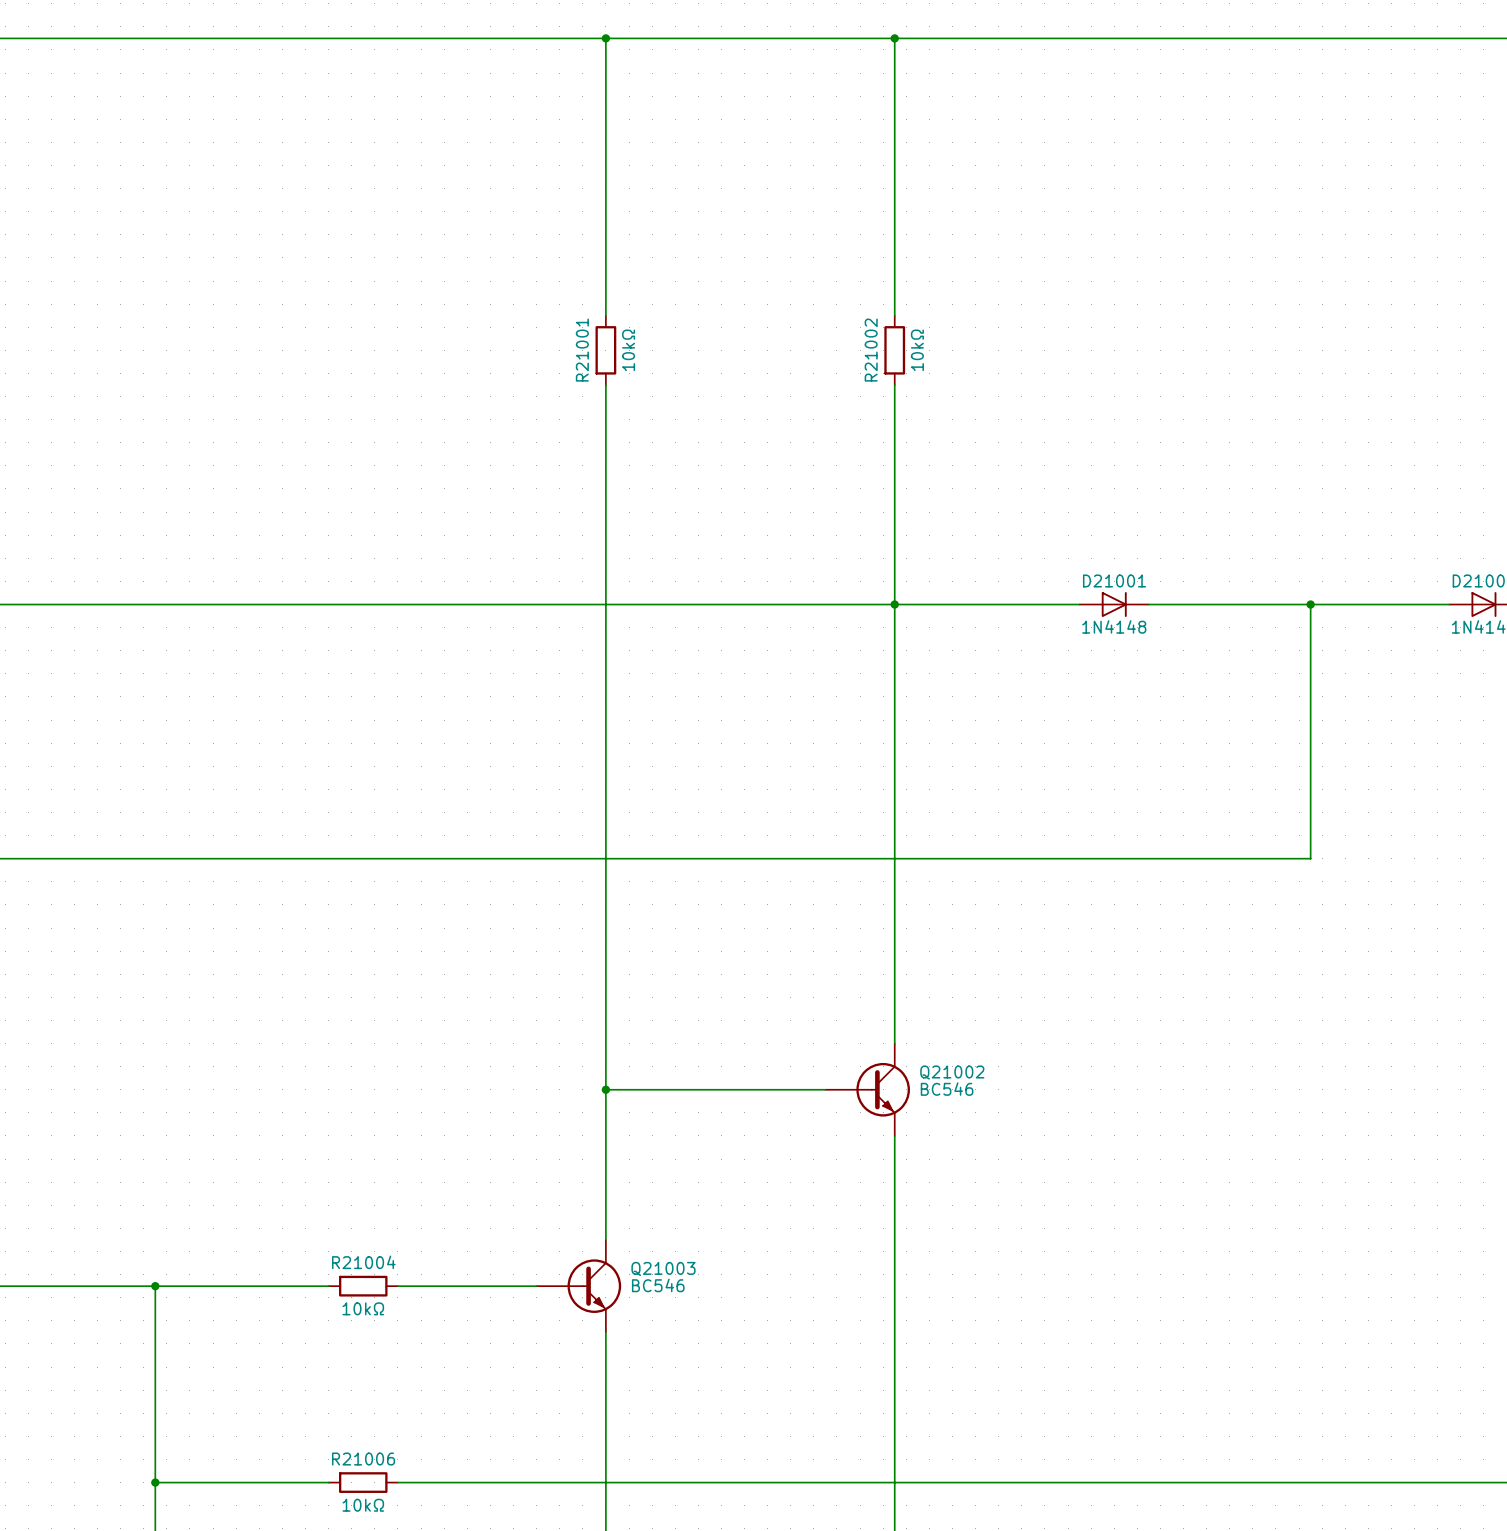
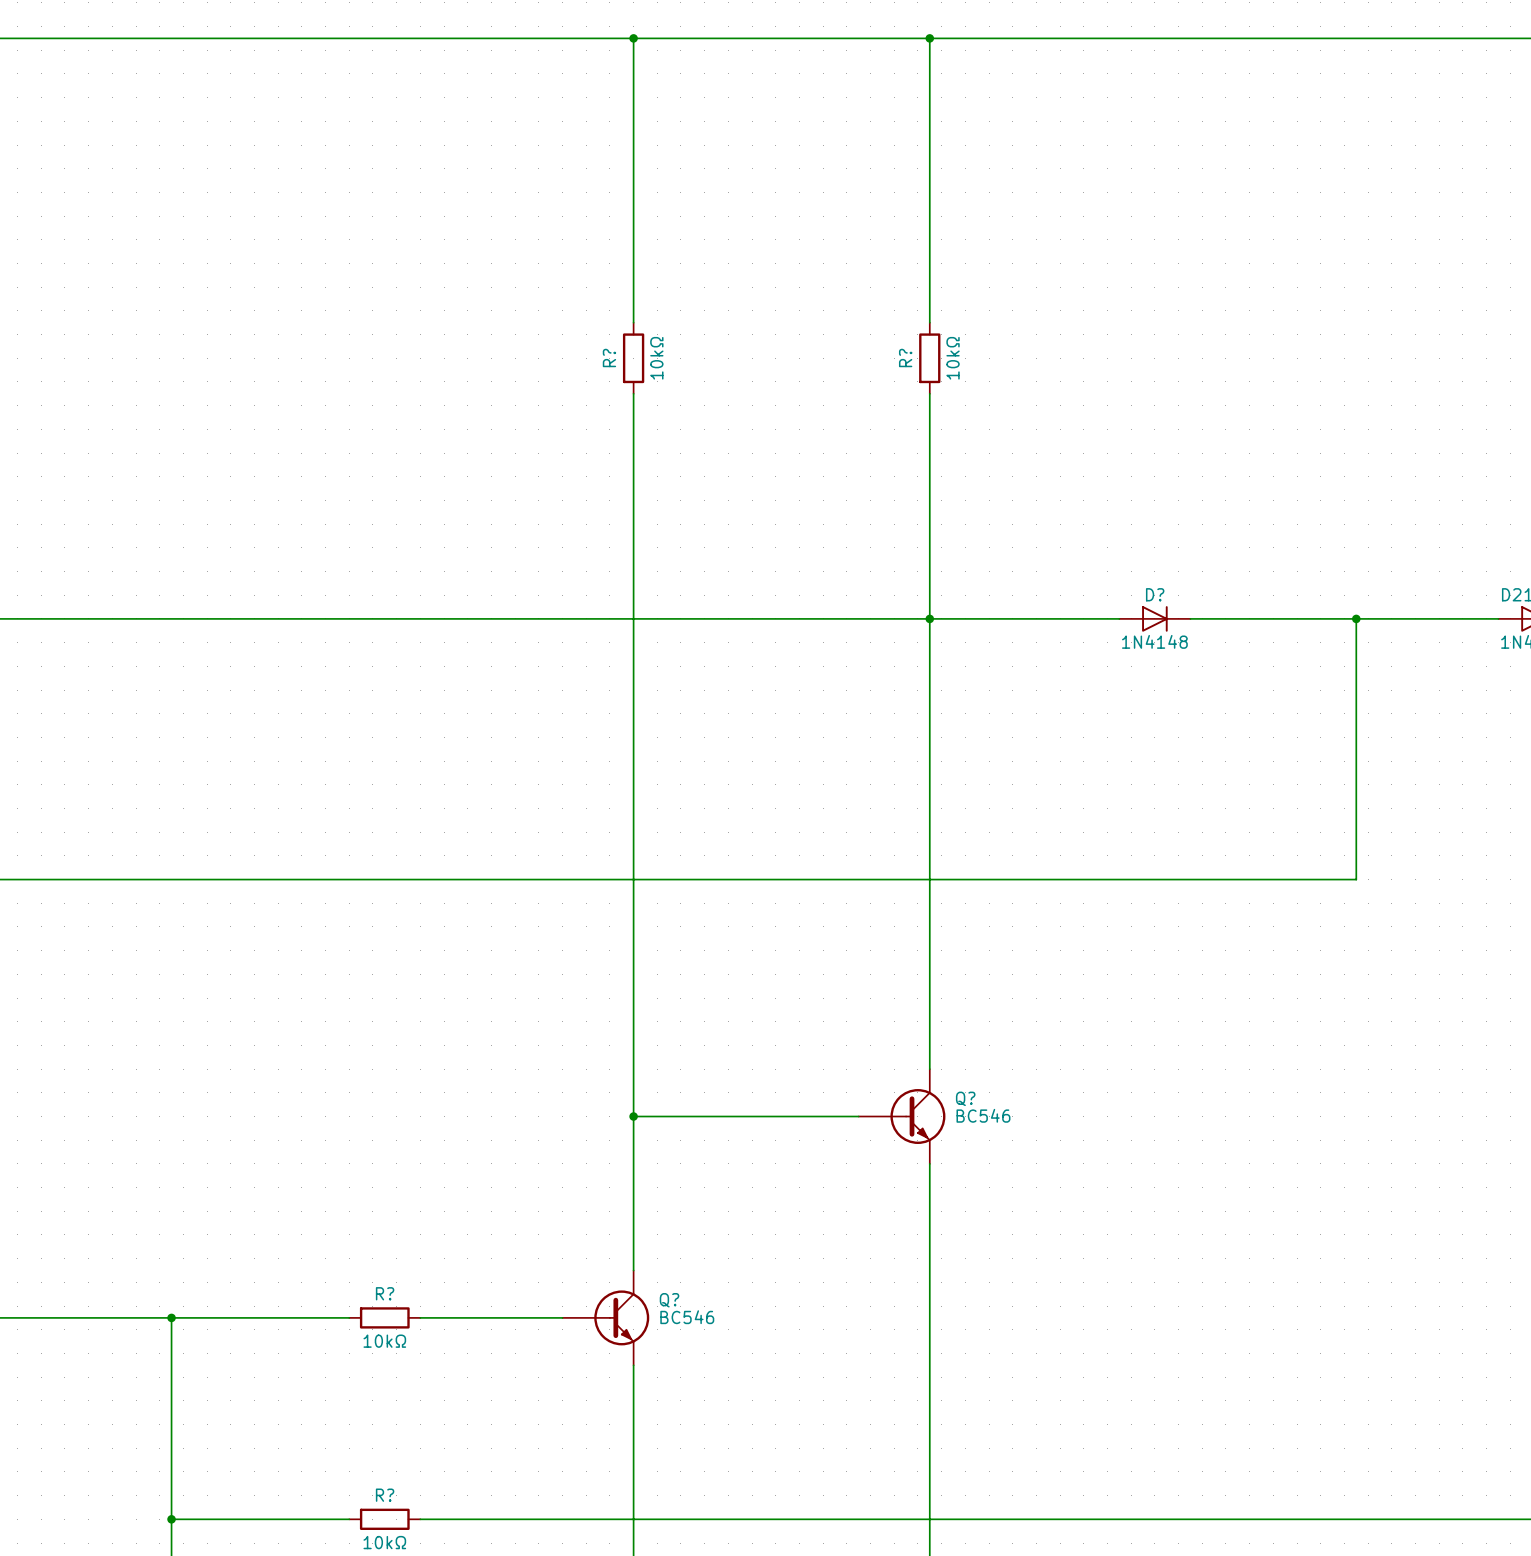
R21001 name: R21001 (582, 350) -> R? (609, 357)
R21002 name: R21002 (871, 350) -> R? (905, 357)
D21001 name: D21001 (1114, 580) -> D? (1155, 594)
Q21002 name: Q21002 (952, 1072) -> Q? (965, 1098)
R21004 name: R21004 (363, 1262) -> R? (385, 1293)
Q21003 name: Q21003 (663, 1268) -> Q? (669, 1300)
R21006 name: R21006 (363, 1459) -> R? (385, 1495)

